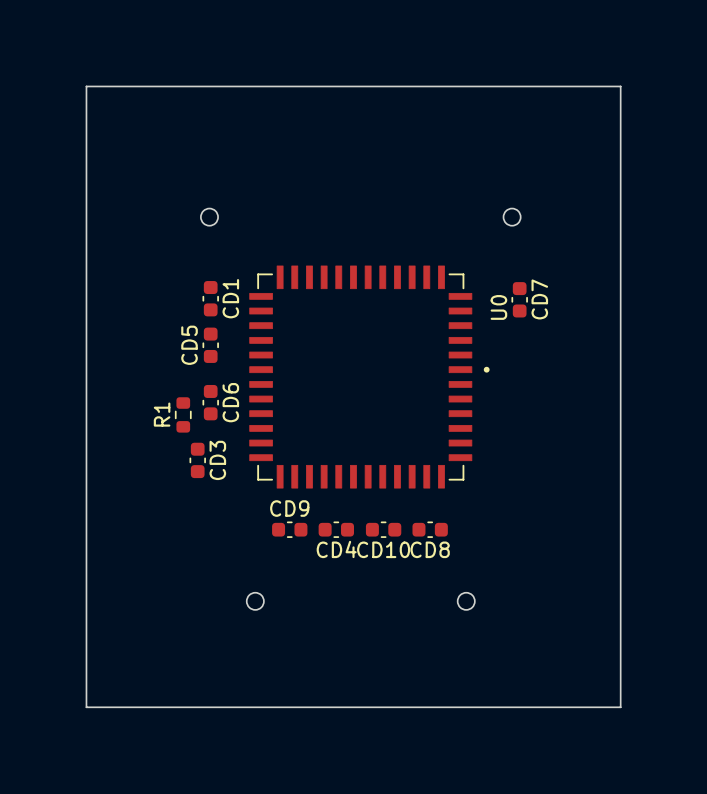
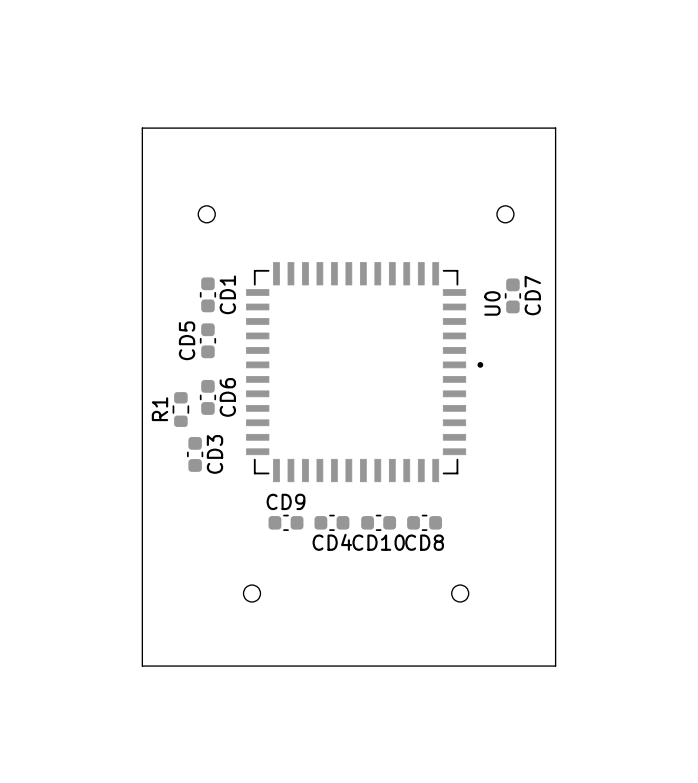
board edge: (86, 86) (620, 86) (620, 707) (86, 707) (86, 86) -> (142, 128) (142, 666) (555, 666) (555, 128) (142, 128)

